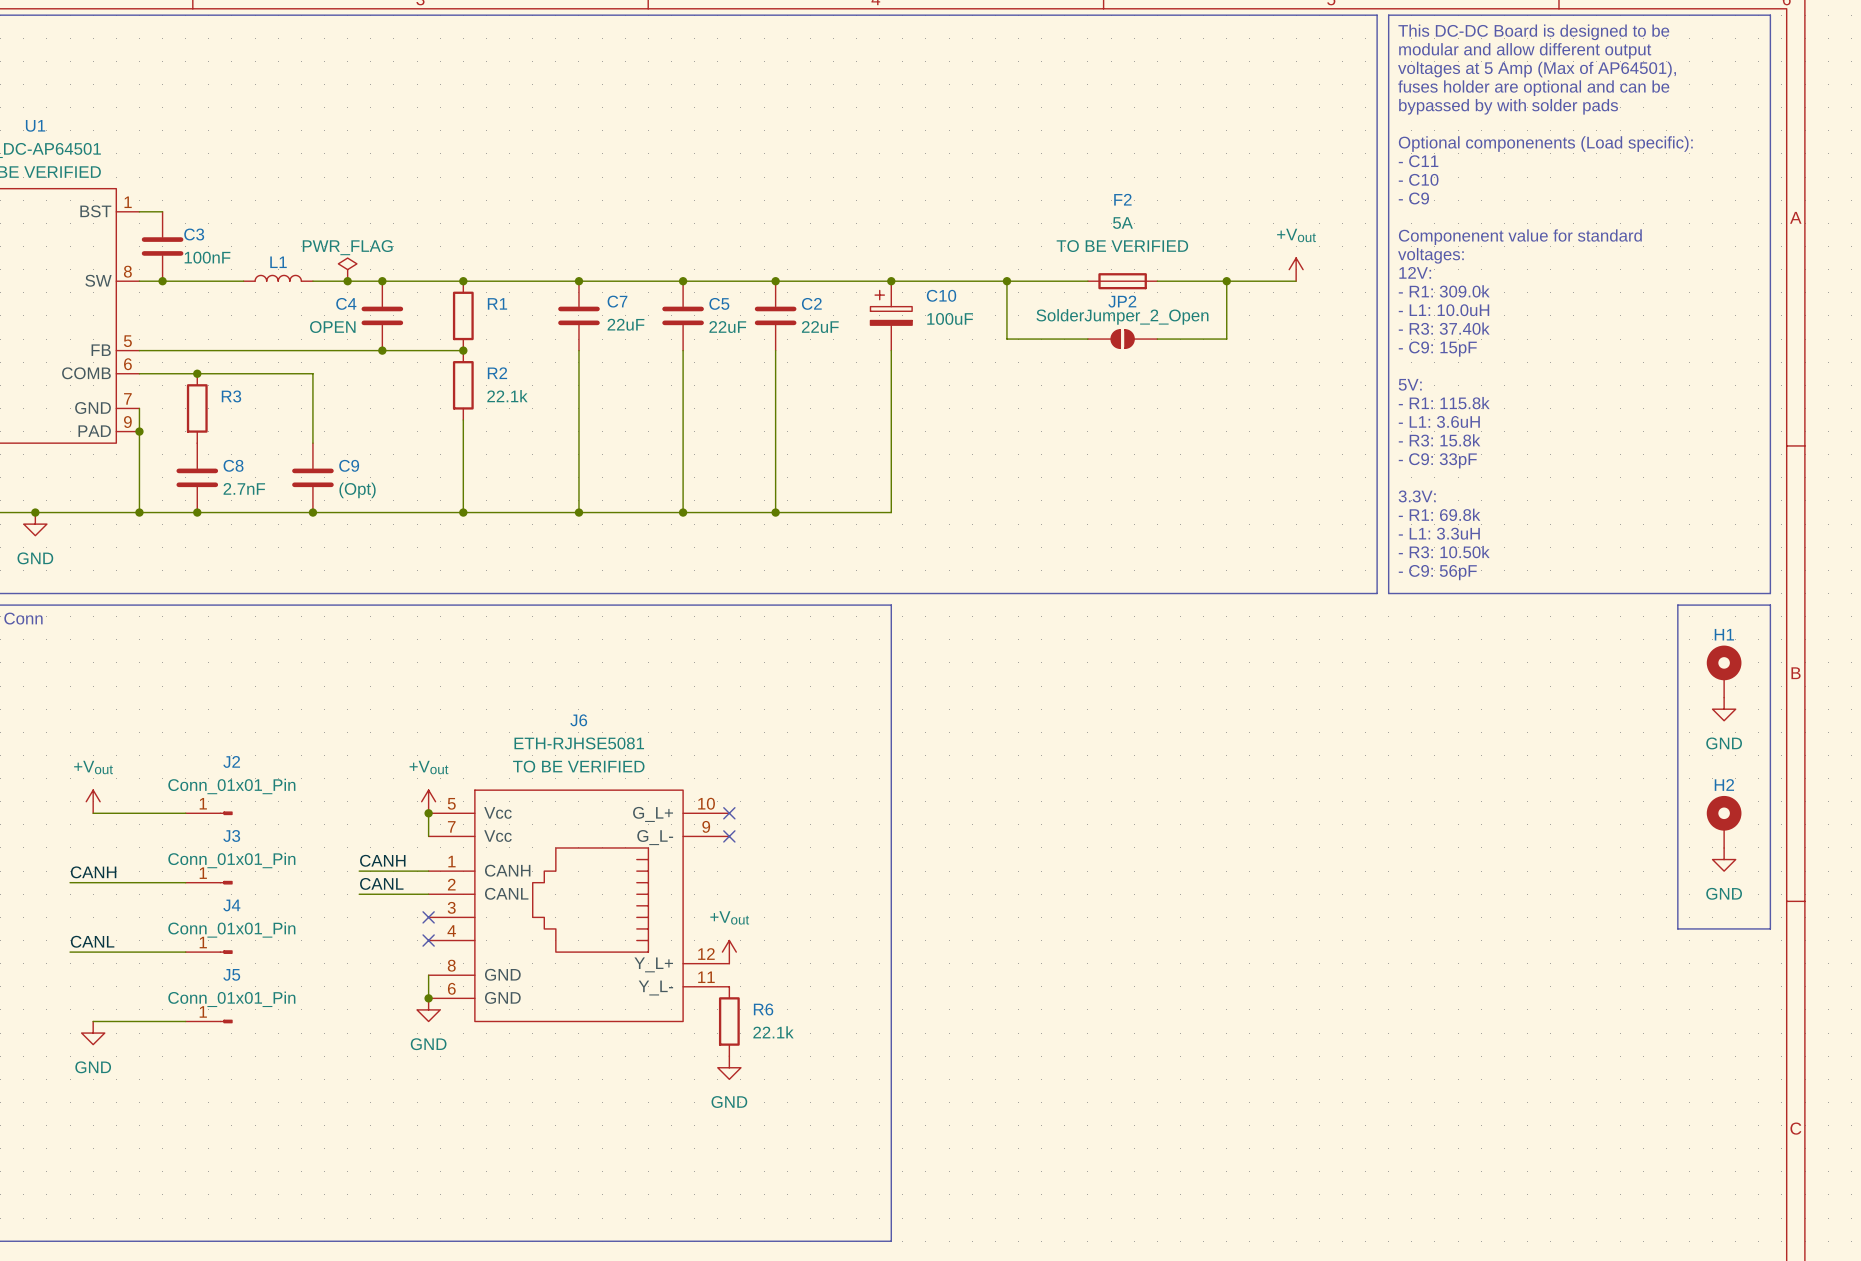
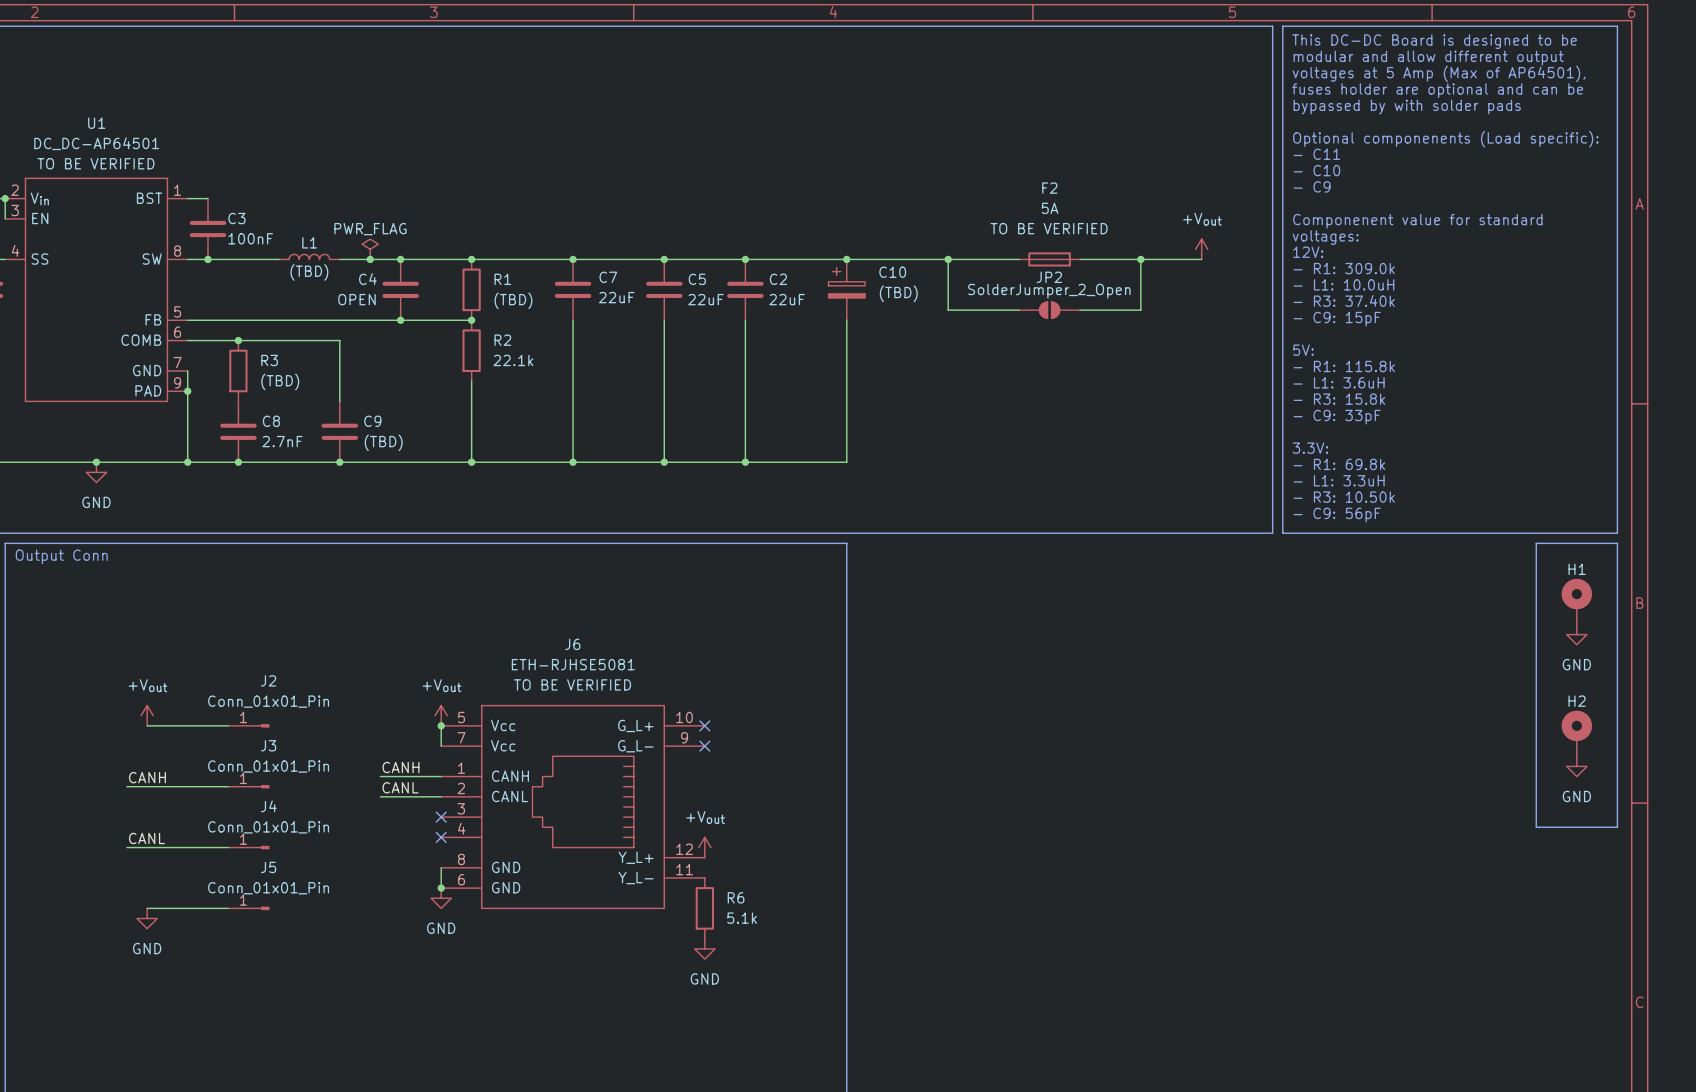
L1 value: none -> (TBD) (309, 272)
C10 value: 100uF (950, 318) -> (TBD) (898, 293)
R1 value: none -> (TBD) (513, 300)
R3 value: none -> (TBD) (280, 381)
C9 value: (Opt) (357, 490) -> (TBD) (383, 442)
R6 value: 22.1k (773, 1032) -> 5.1k (742, 918)

